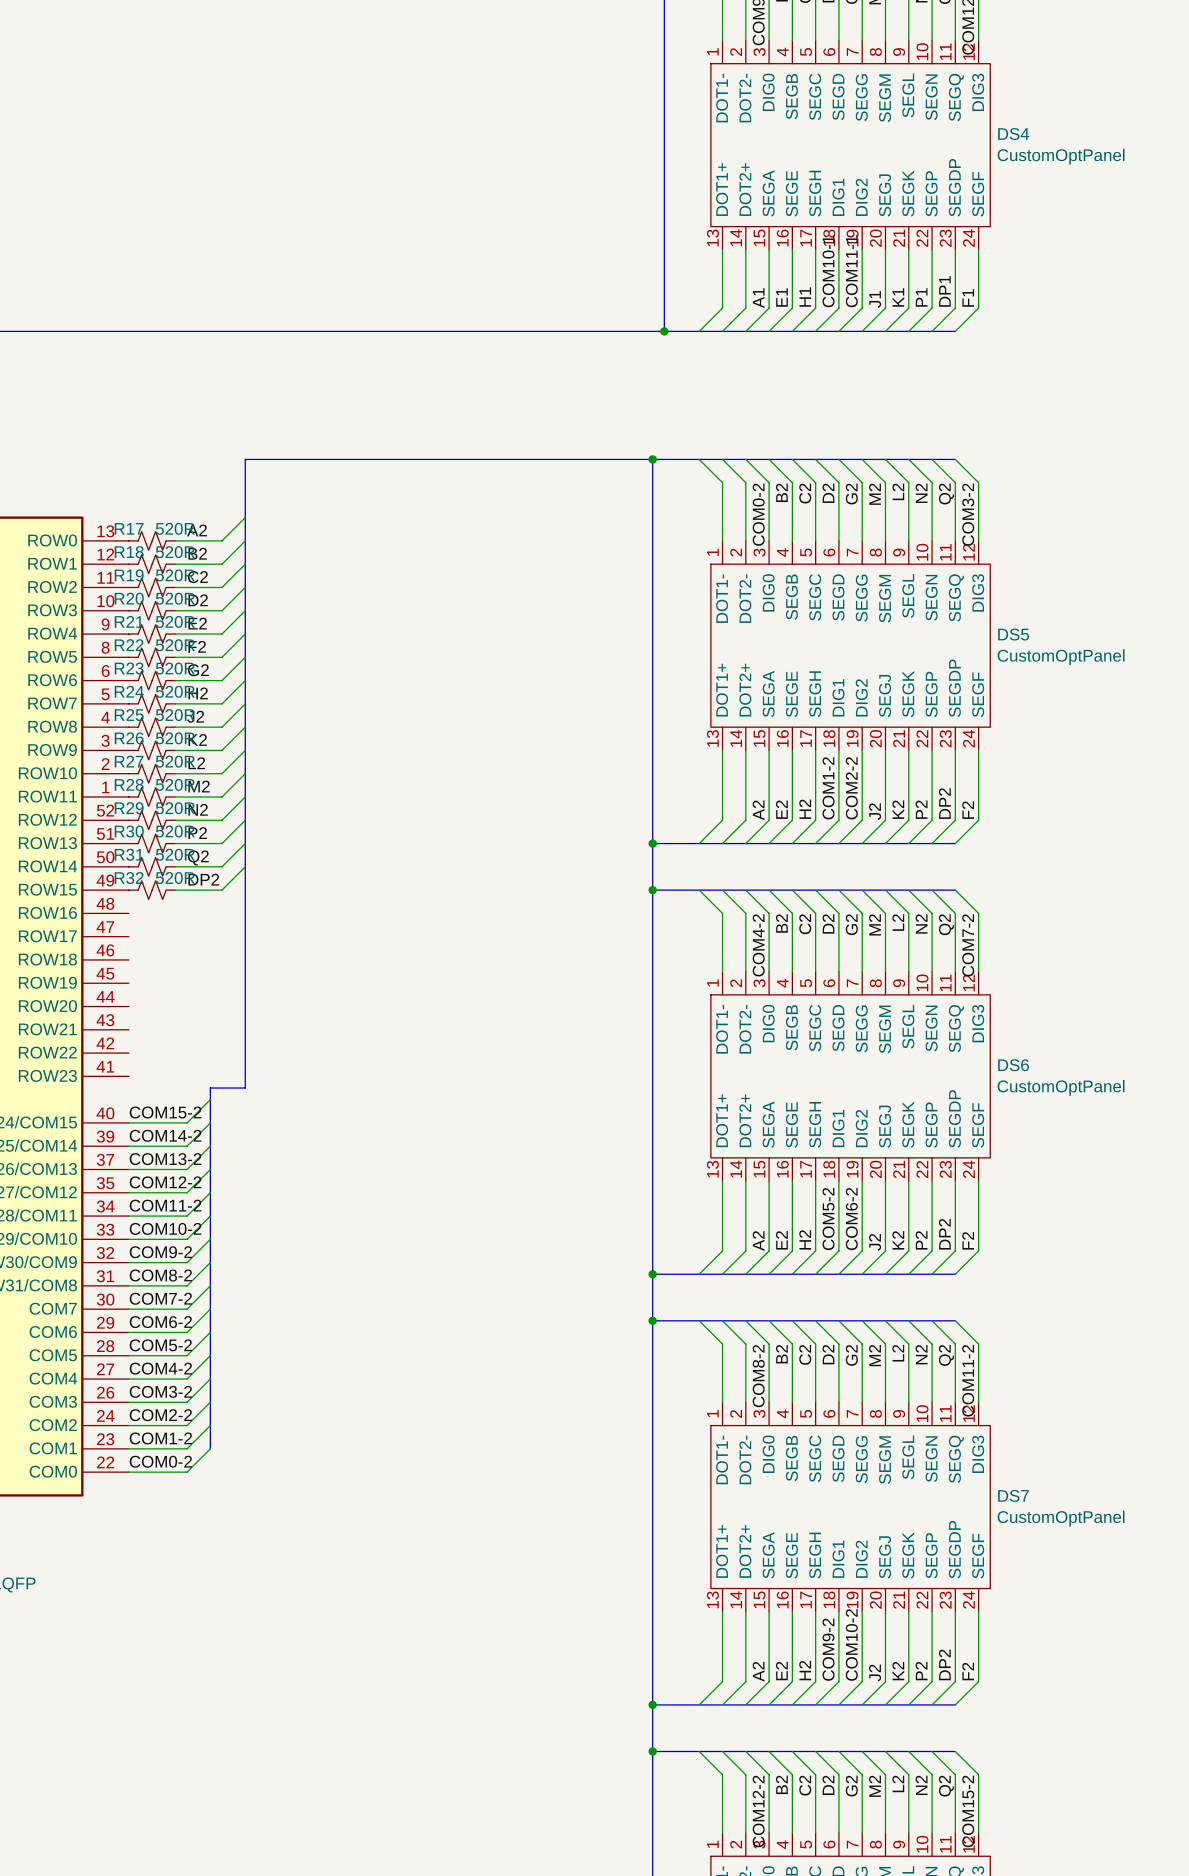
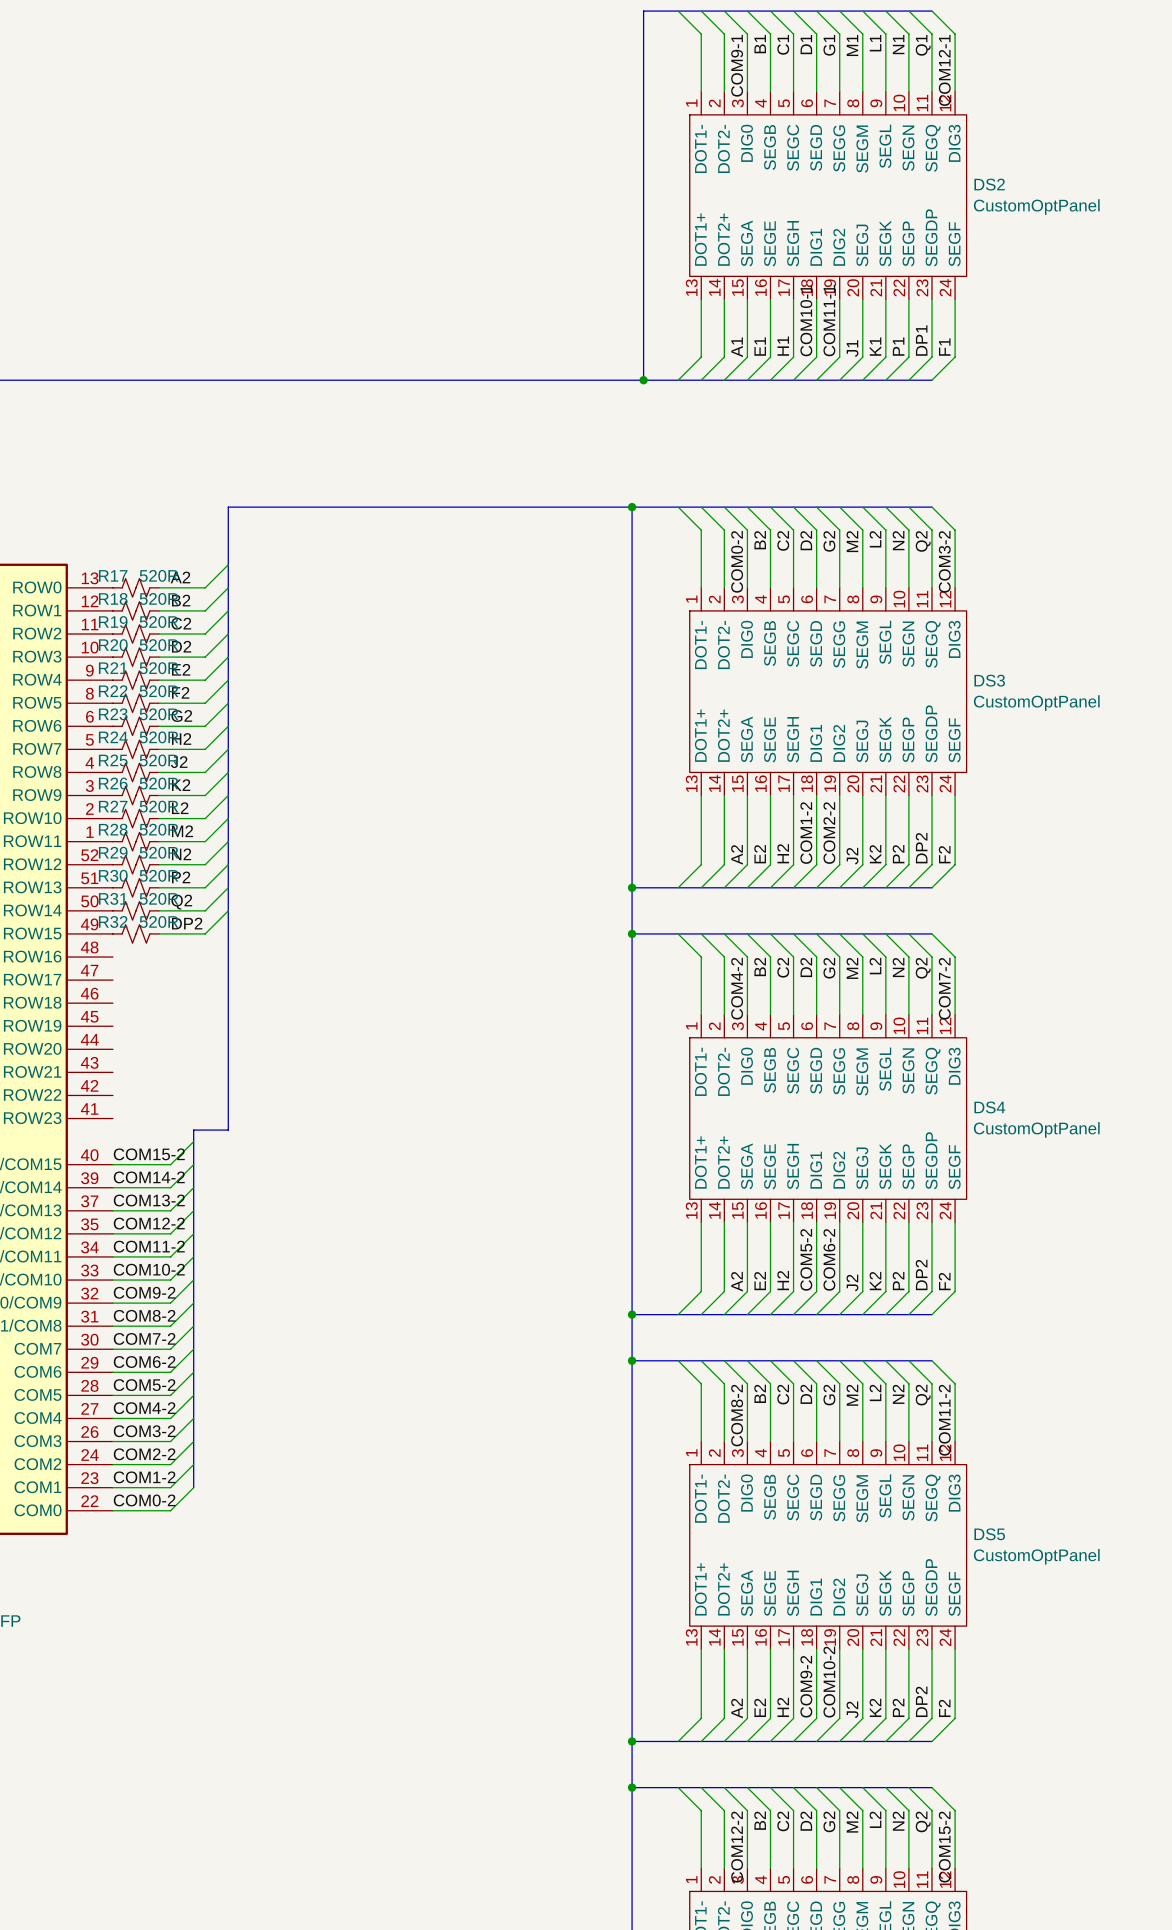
DS4 name: DS4 (1013, 134) -> DS2 (989, 184)
DS5 name: DS5 (1013, 634) -> DS3 (989, 680)
DS6 name: DS6 (1013, 1065) -> DS4 (989, 1107)
DS7 name: DS7 (1013, 1495) -> DS5 (989, 1534)

